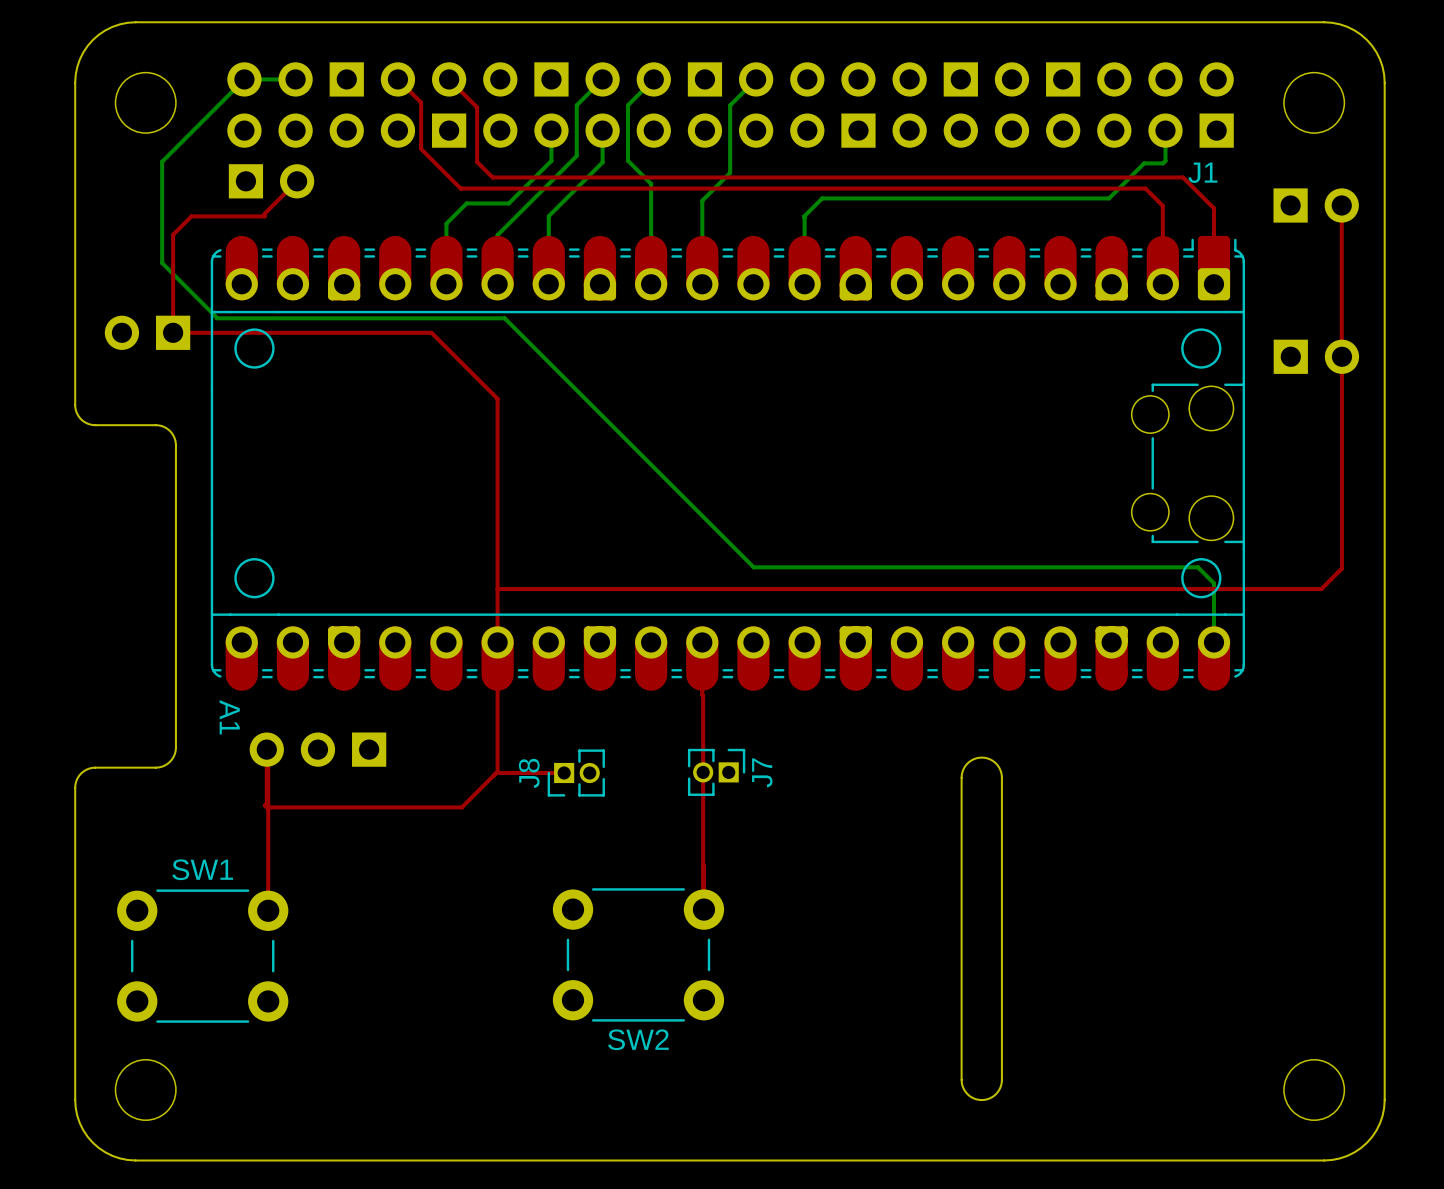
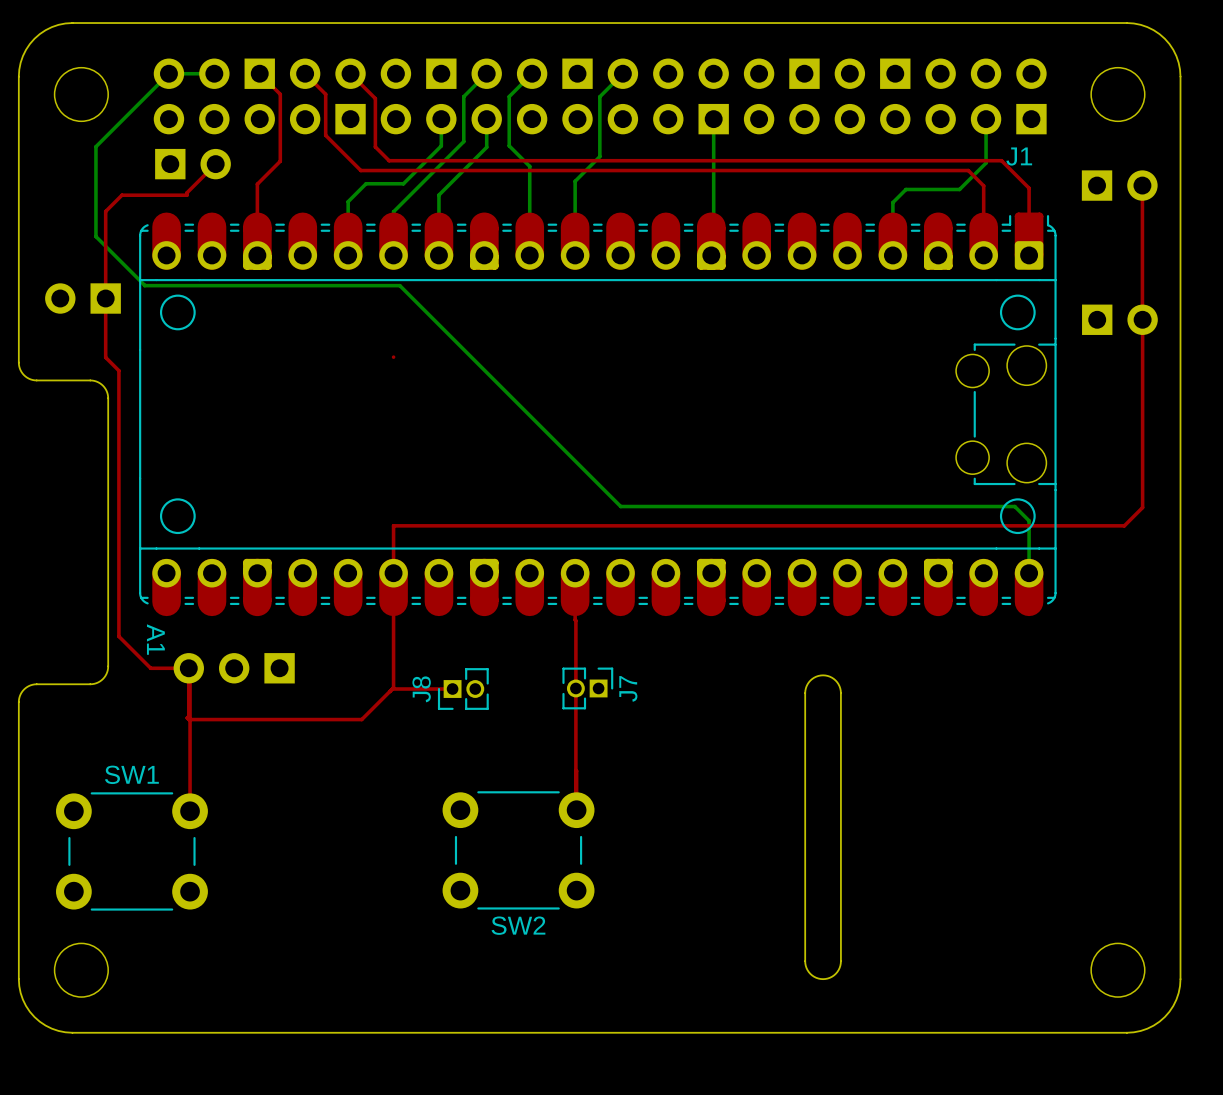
top track: none -> (259, 73) (280, 94) (280, 161) (257, 184) (257, 255)
bottom track: none -> (713, 119) (713, 253) (711, 255)
bottom track: (1165, 160) (1163, 163) (1144, 163) (1109, 198) (822, 198) (803, 216) (804, 284) -> (986, 146) (986, 163) (959, 189) (905, 189) (892, 202) (892, 255)
top track: (173, 332) (431, 332) (497, 398) (497, 589) -> (105, 298) (105, 357) (118, 370) (118, 636) (150, 668) (188, 668)

